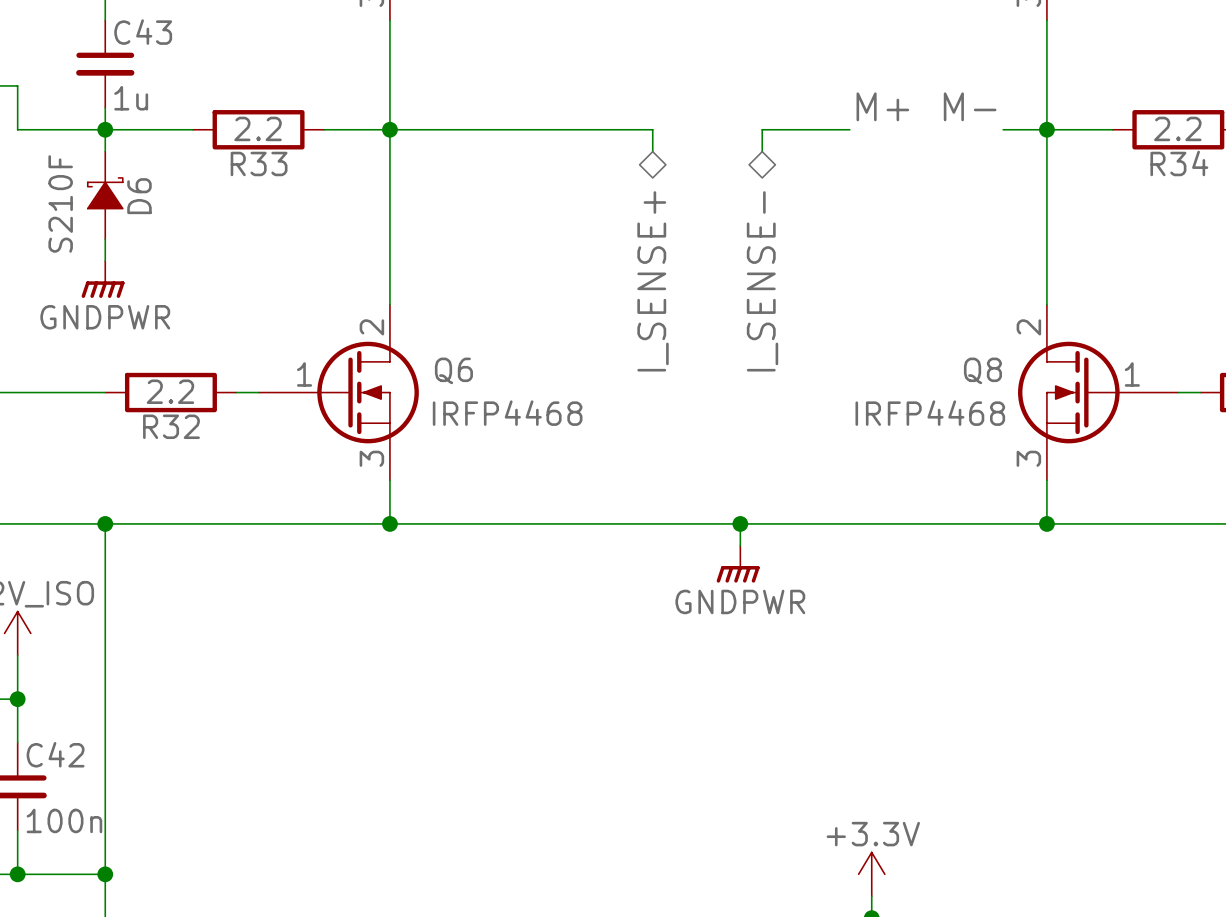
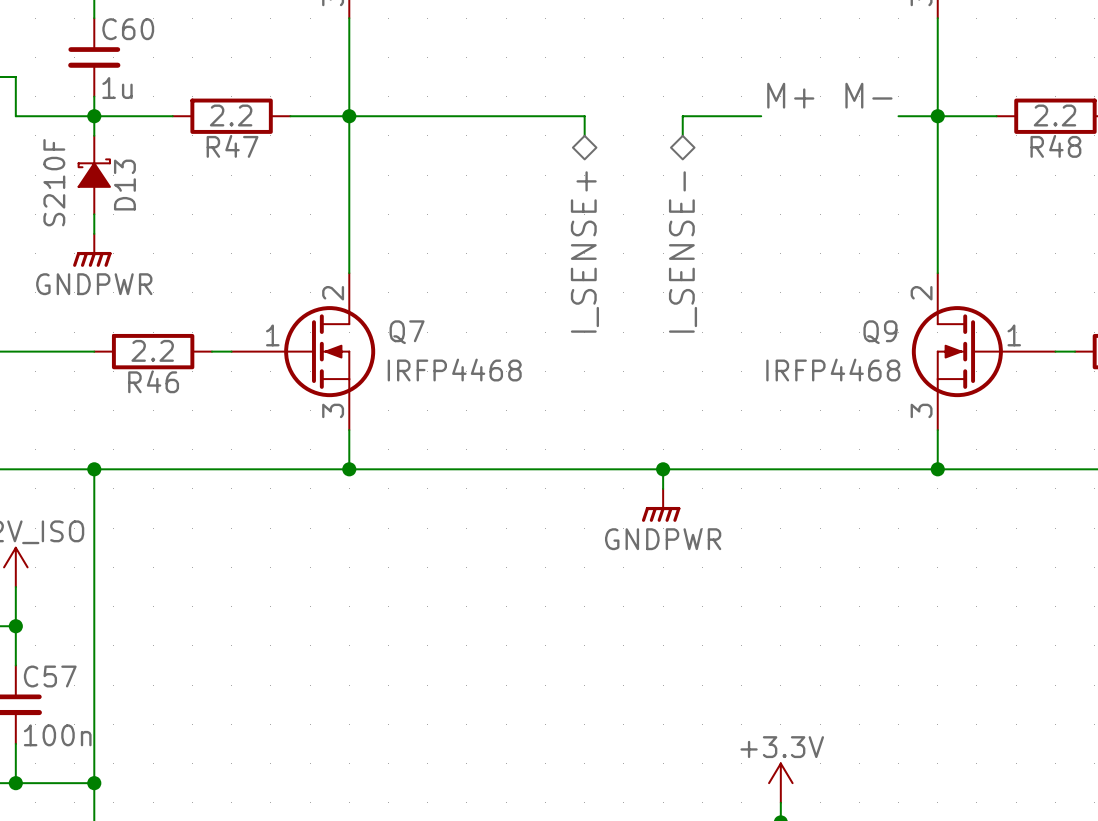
C43 name: C43 (143, 32) -> C60 (128, 29)
R33 name: R33 (259, 163) -> R47 (232, 146)
R34 name: R34 (1179, 163) -> R48 (1055, 146)
D6 name: D6 (139, 196) -> D13 (124, 185)
Q6 name: Q6 (453, 370) -> Q7 (407, 332)
Q8 name: Q8 (982, 370) -> Q9 (880, 332)
R32 name: R32 (171, 426) -> R46 (153, 381)
C42 name: C42 (55, 754) -> C57 (50, 676)

